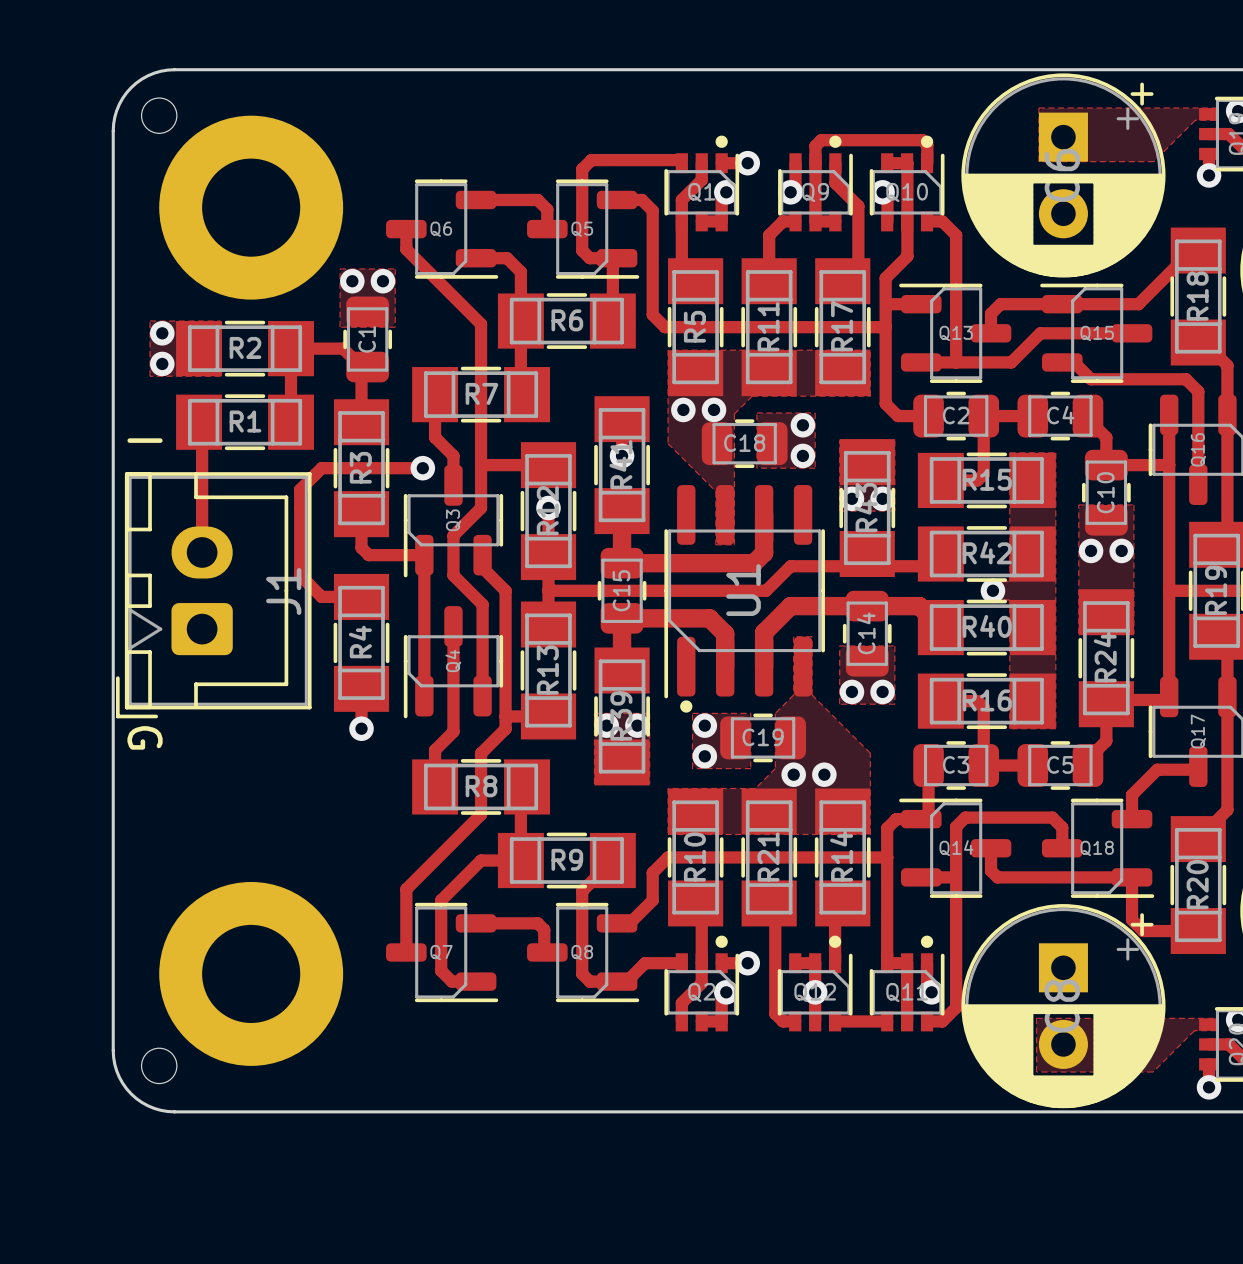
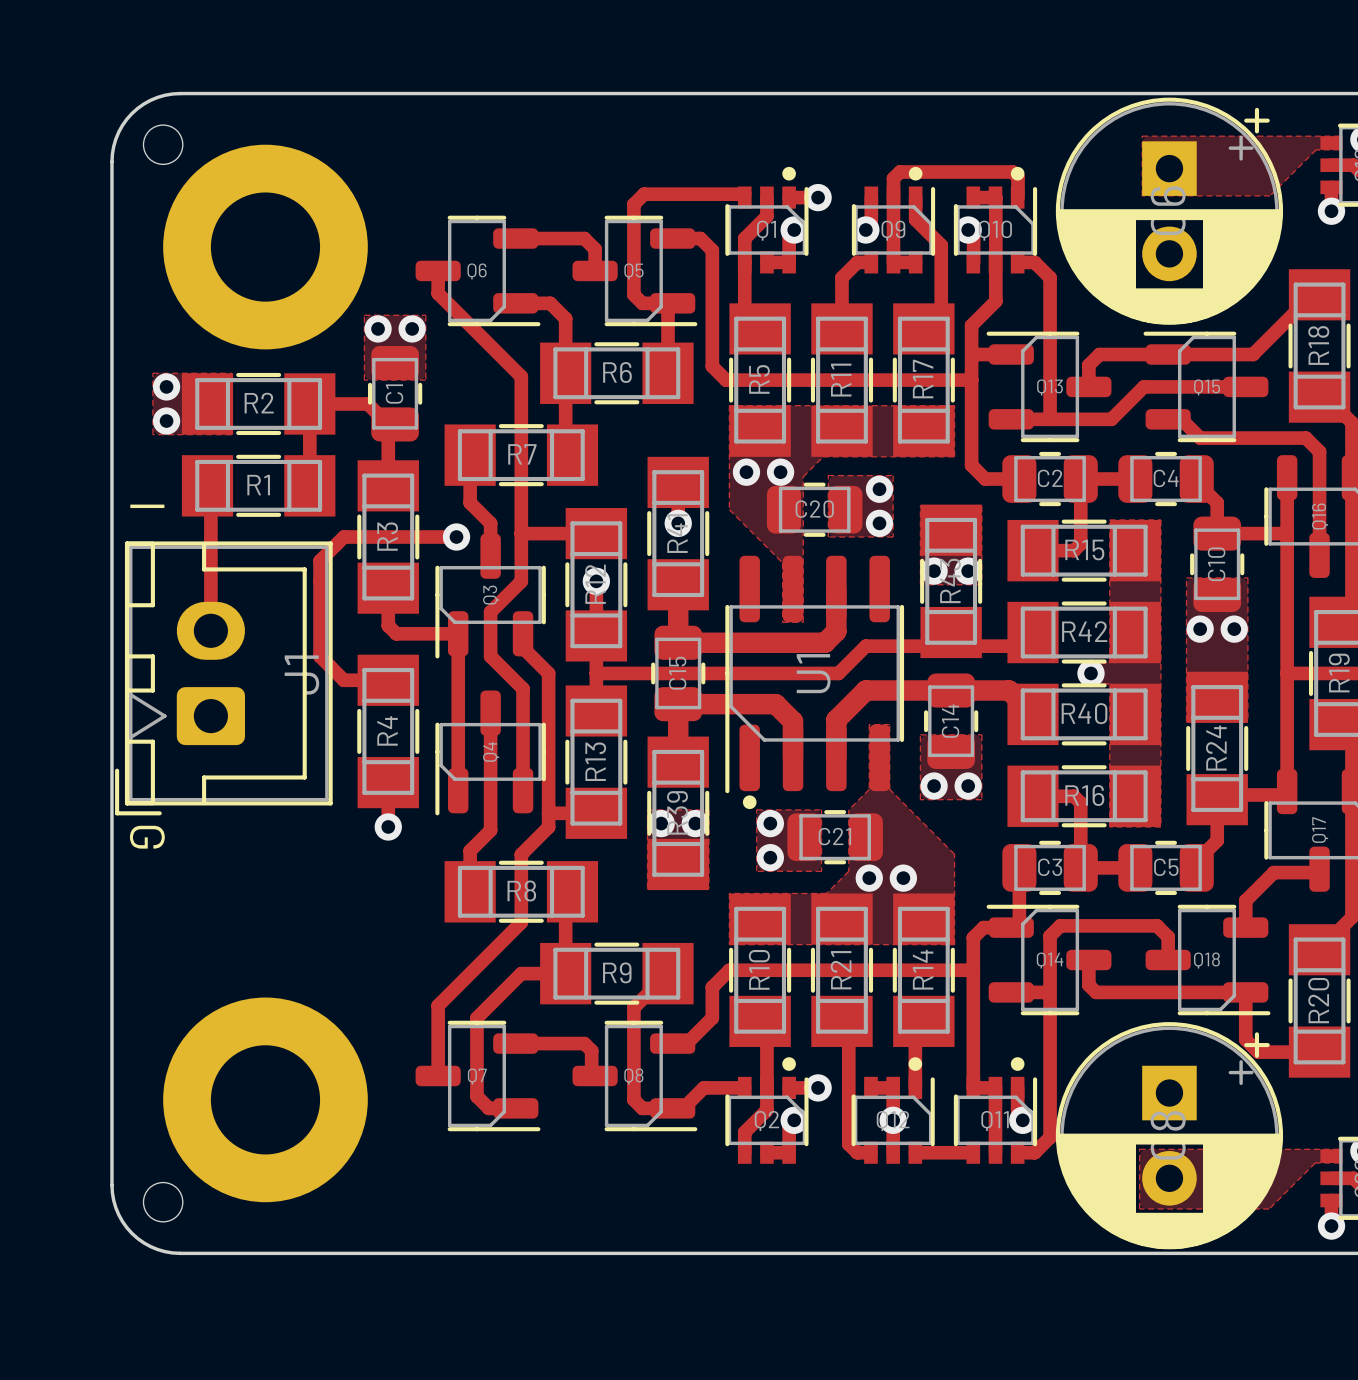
C18 name: C18 (744, 443) -> C20 (814, 509)
C19 name: C19 (763, 737) -> C21 (834, 836)

